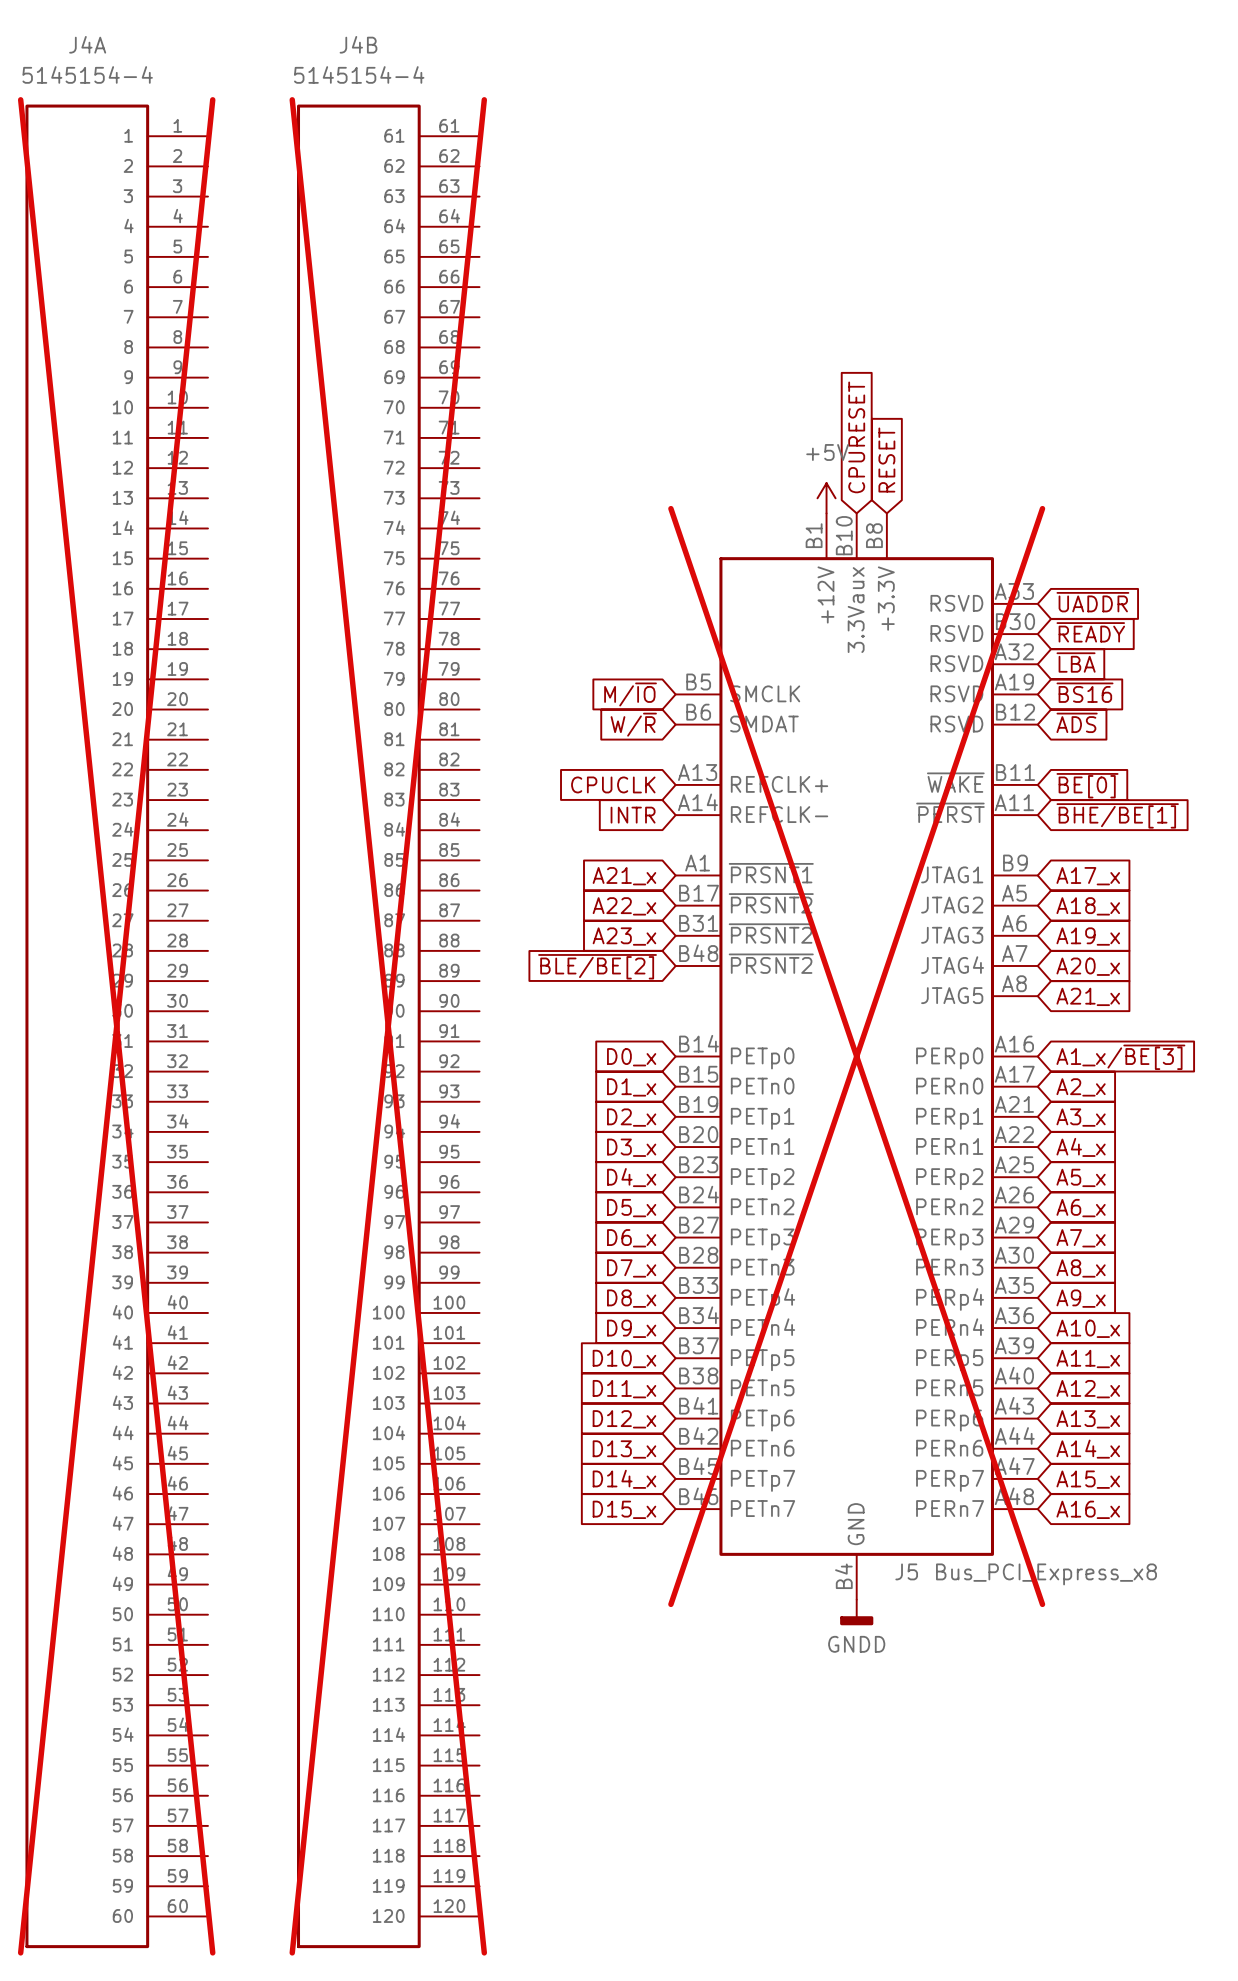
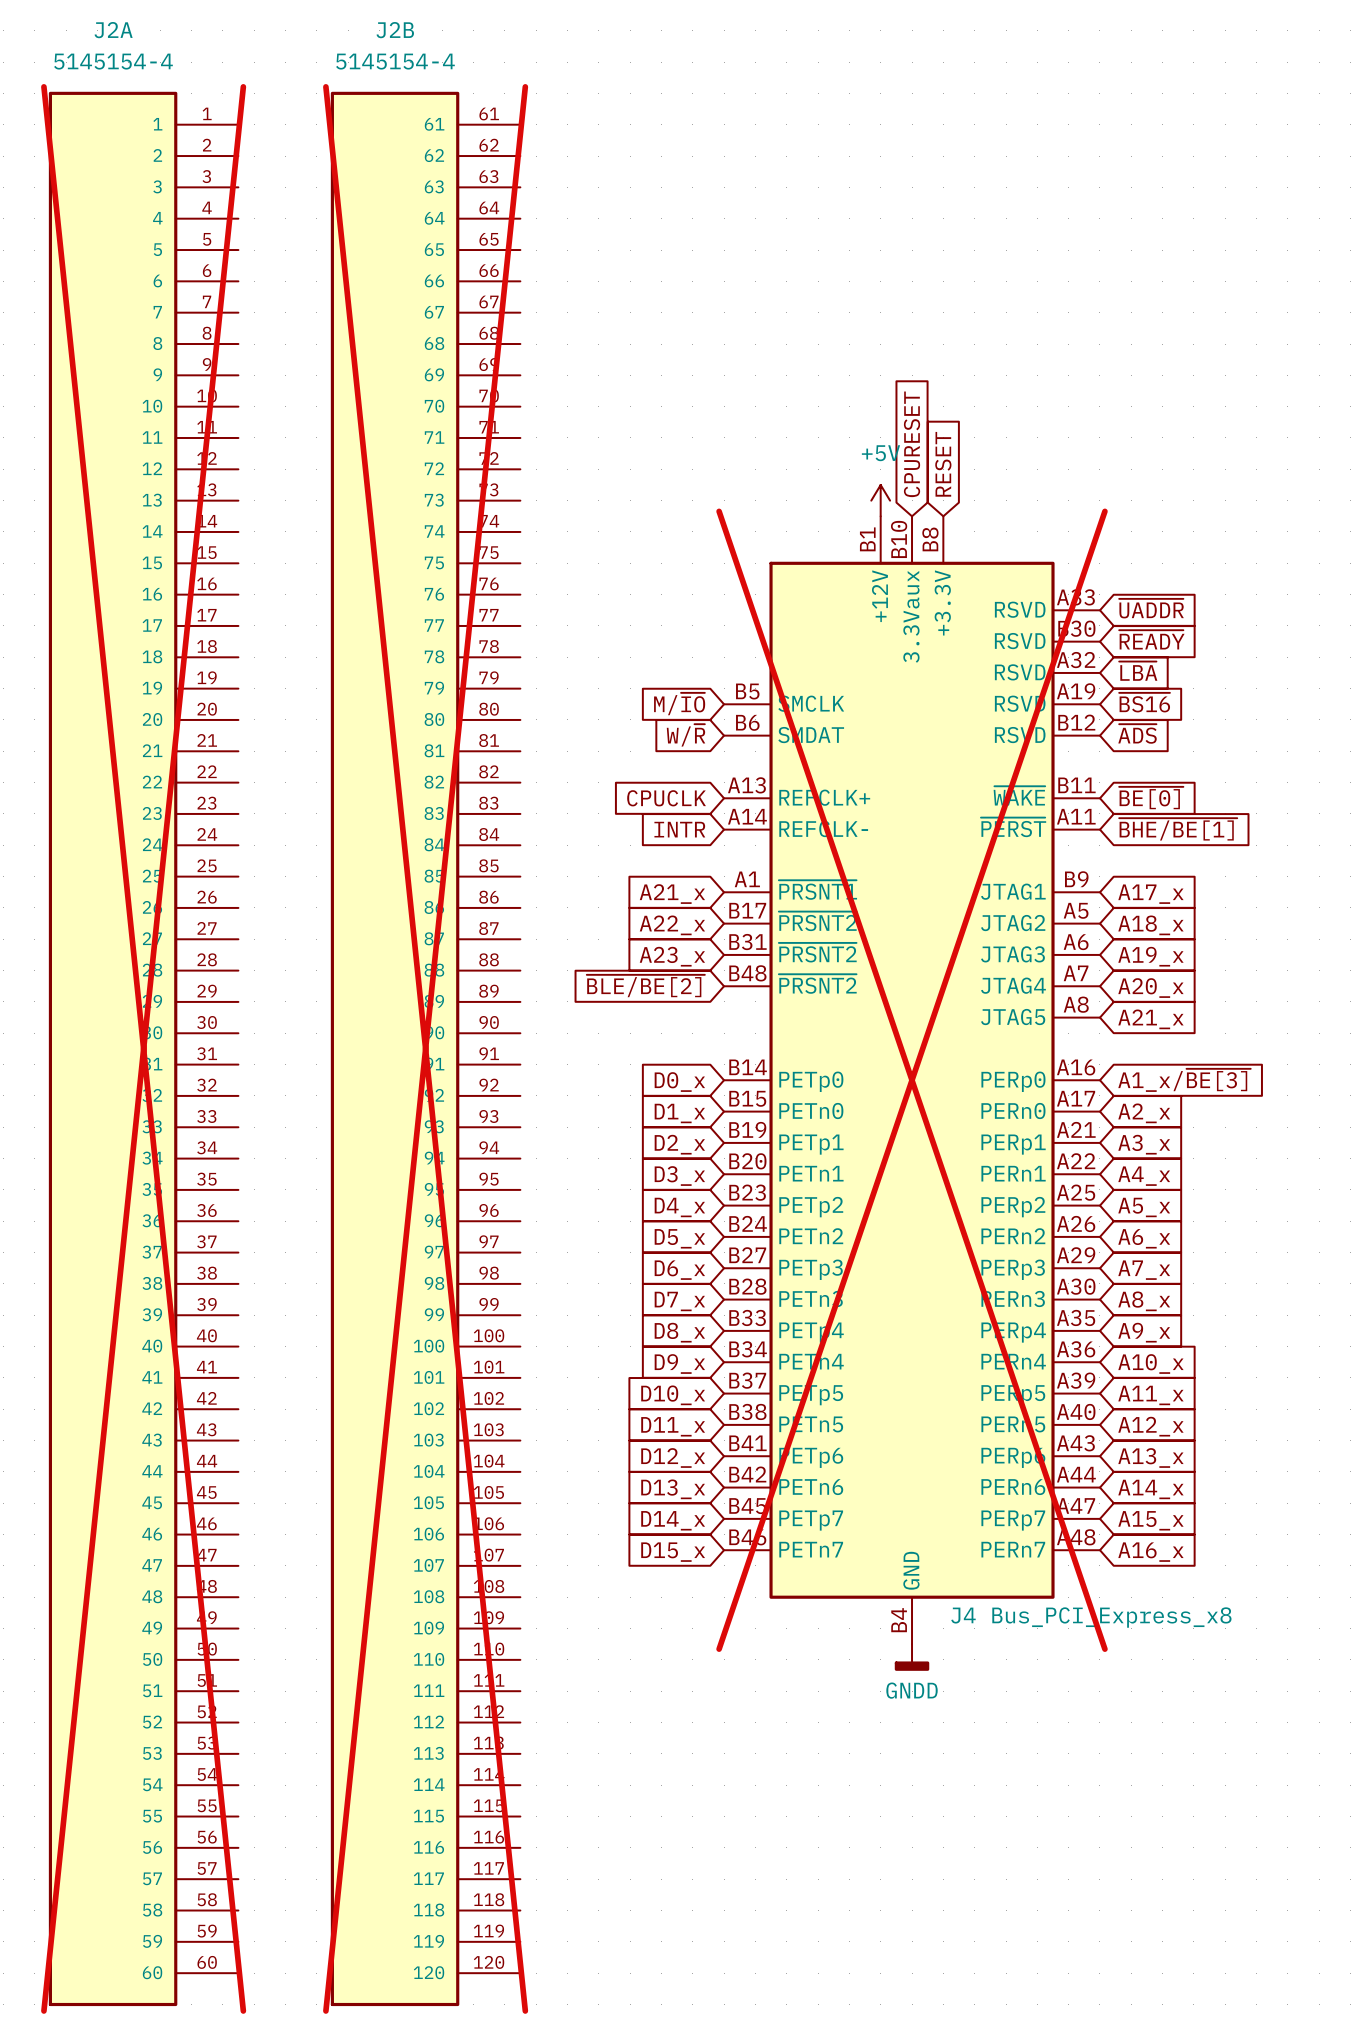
J4A name: J4A (87, 44) -> J2A (113, 30)
J4B name: J4B (358, 44) -> J2B (395, 30)
J5 name: J5 (906, 1571) -> J4 (963, 1615)

